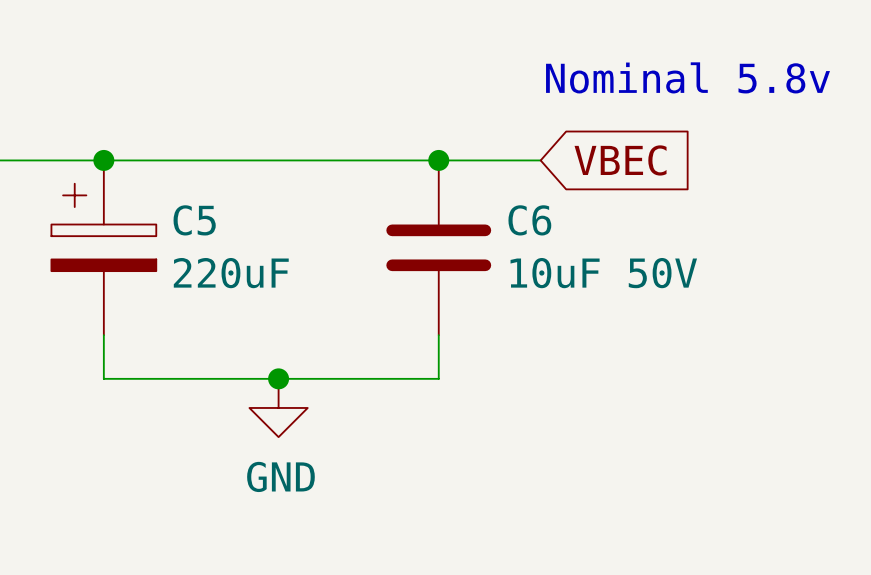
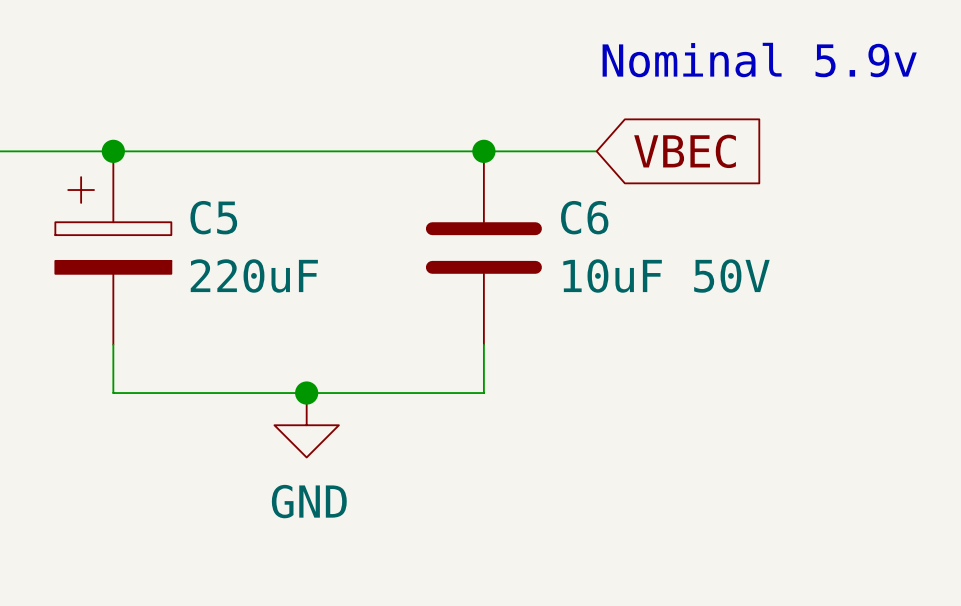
text: Nominal 5.8v (688, 77) -> Nominal 5.9v (759, 60)

